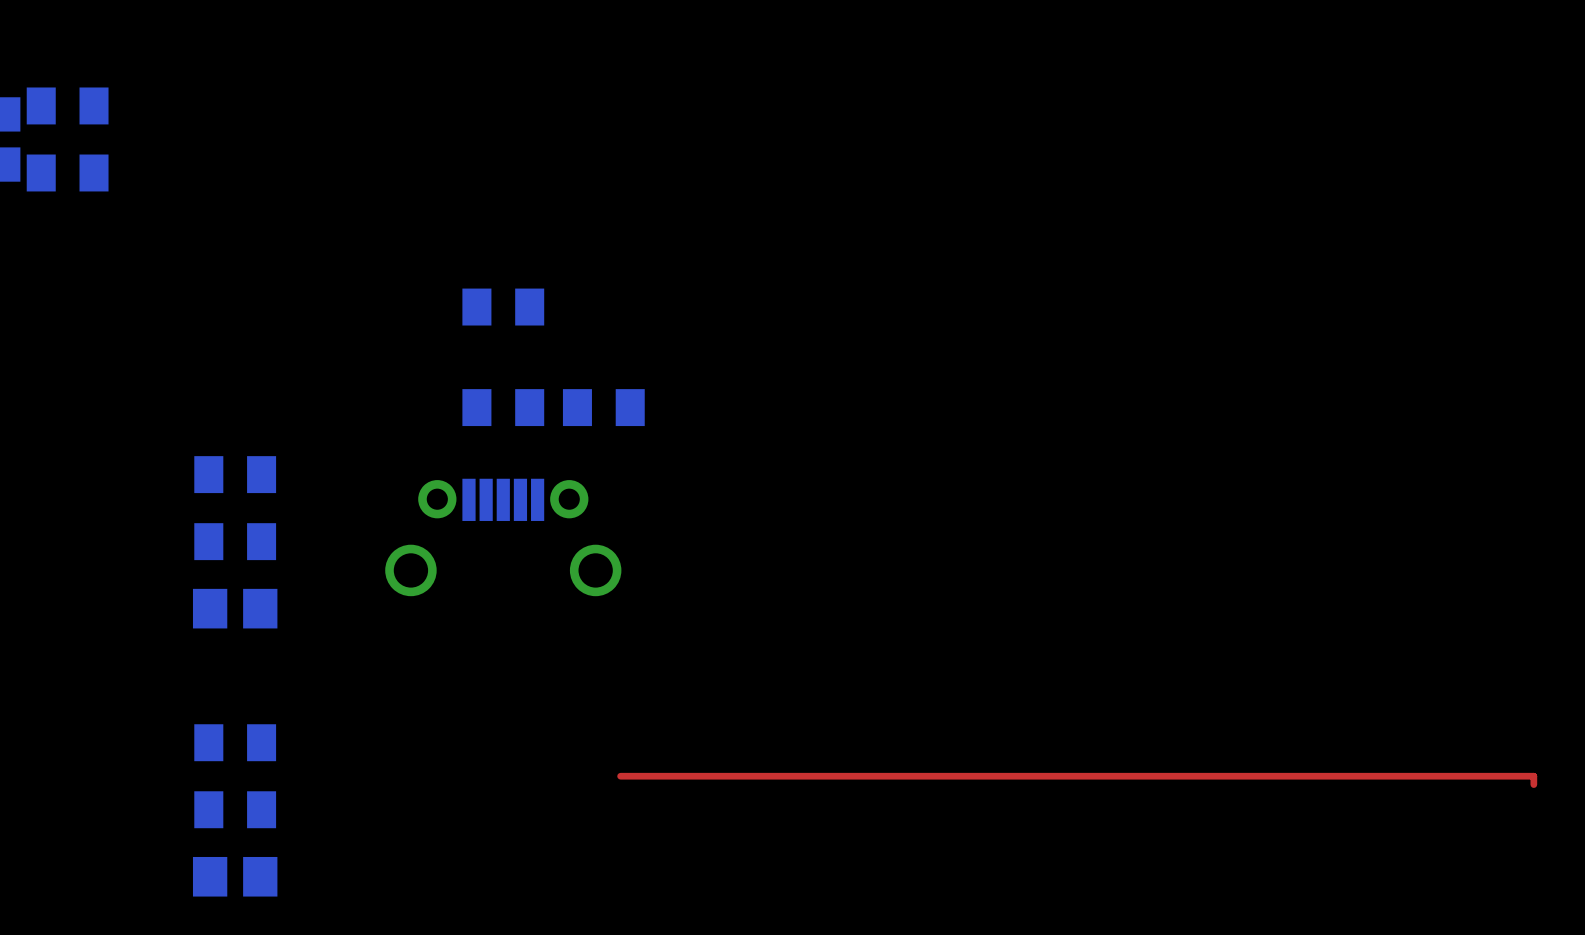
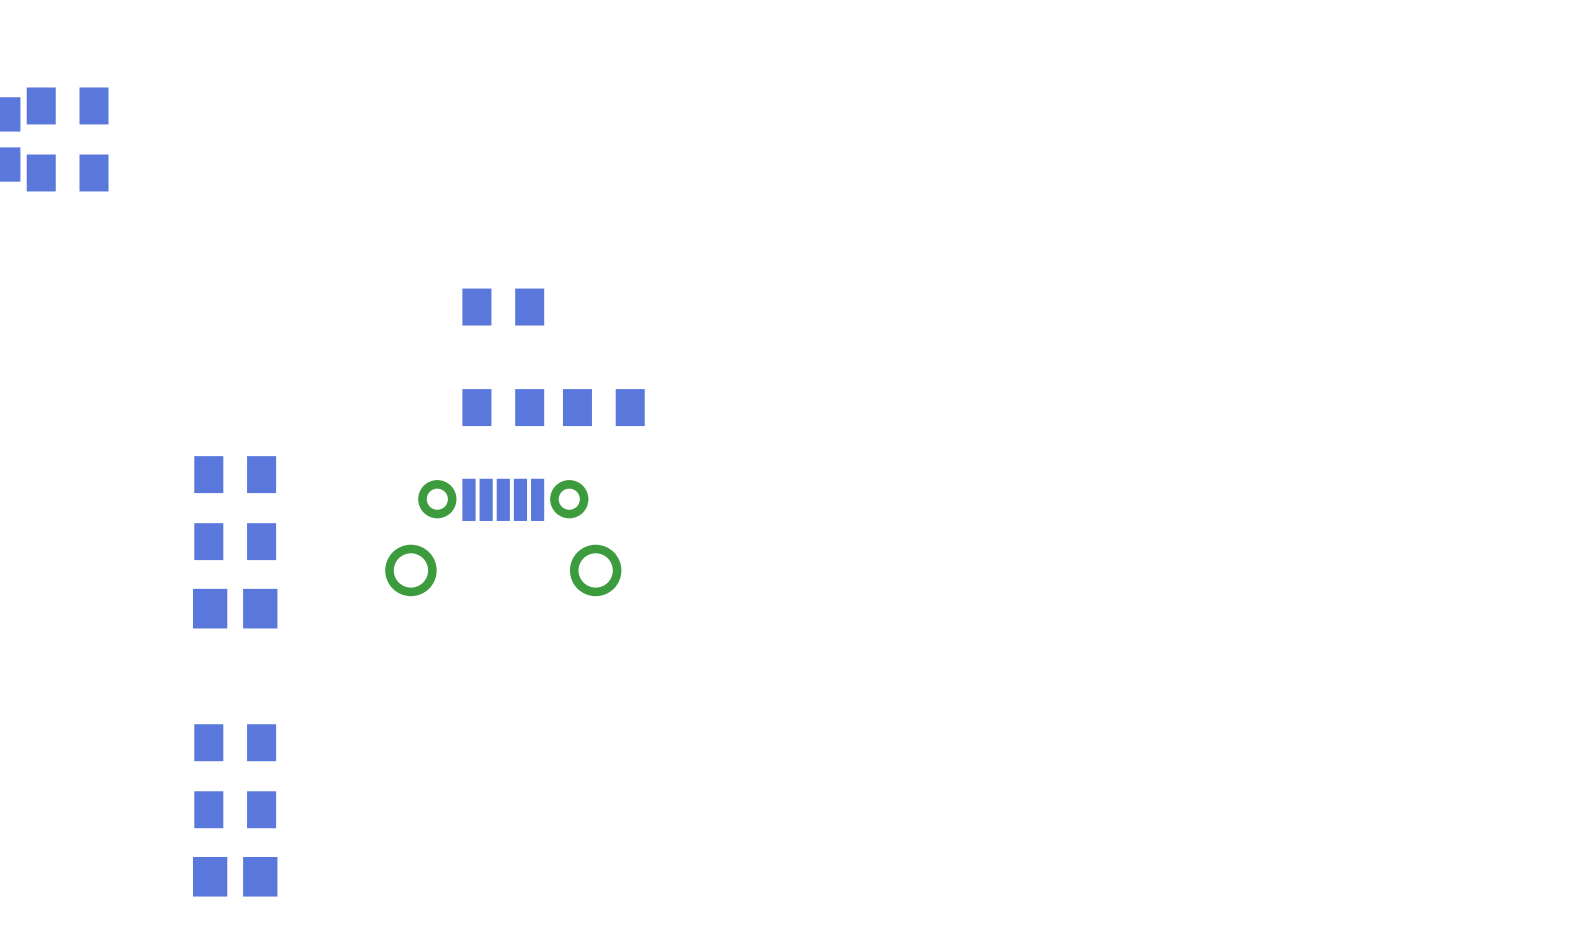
top track: (620, 776) (1533, 776) (1533, 784) -> none

